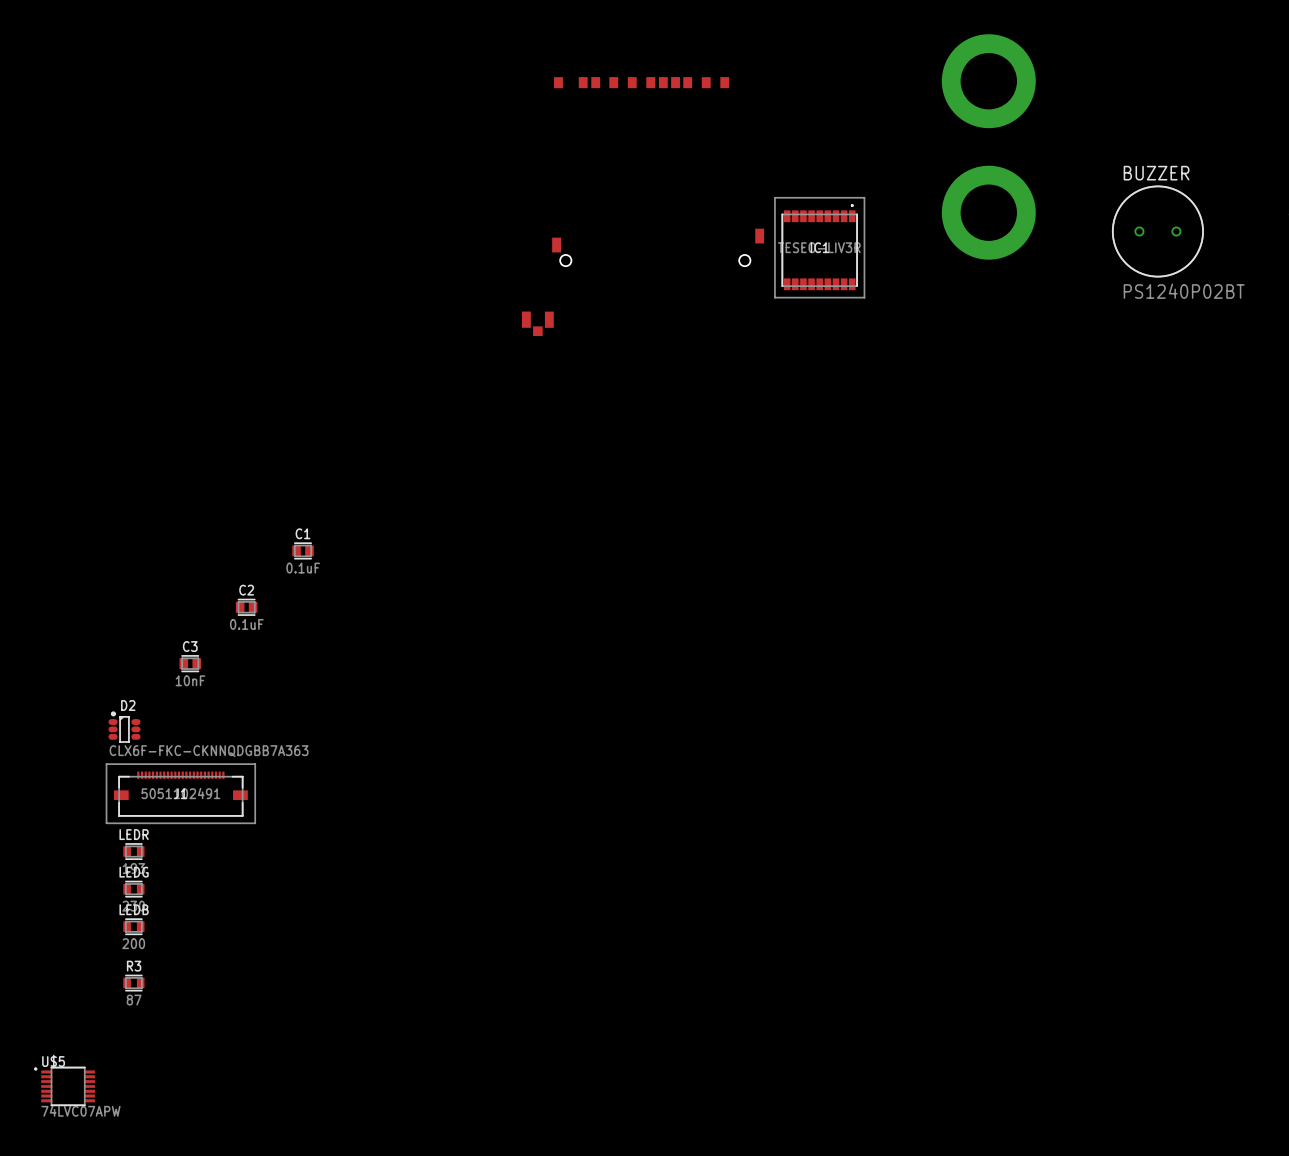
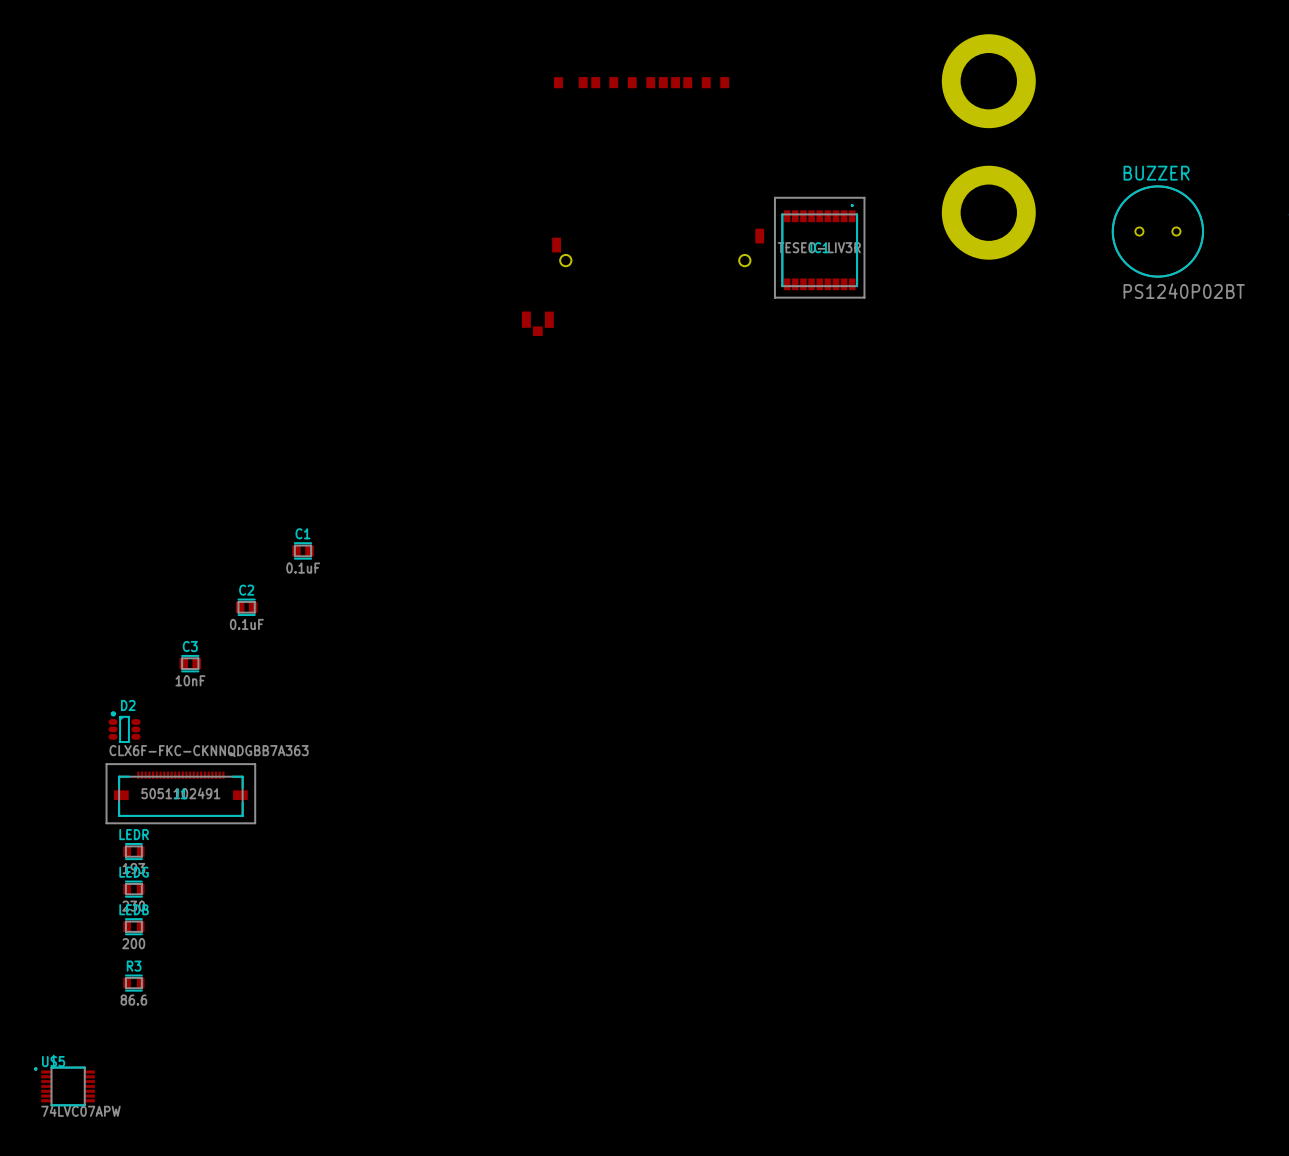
R3 value: 87 (134, 1000) -> 86.6 (133, 1000)

